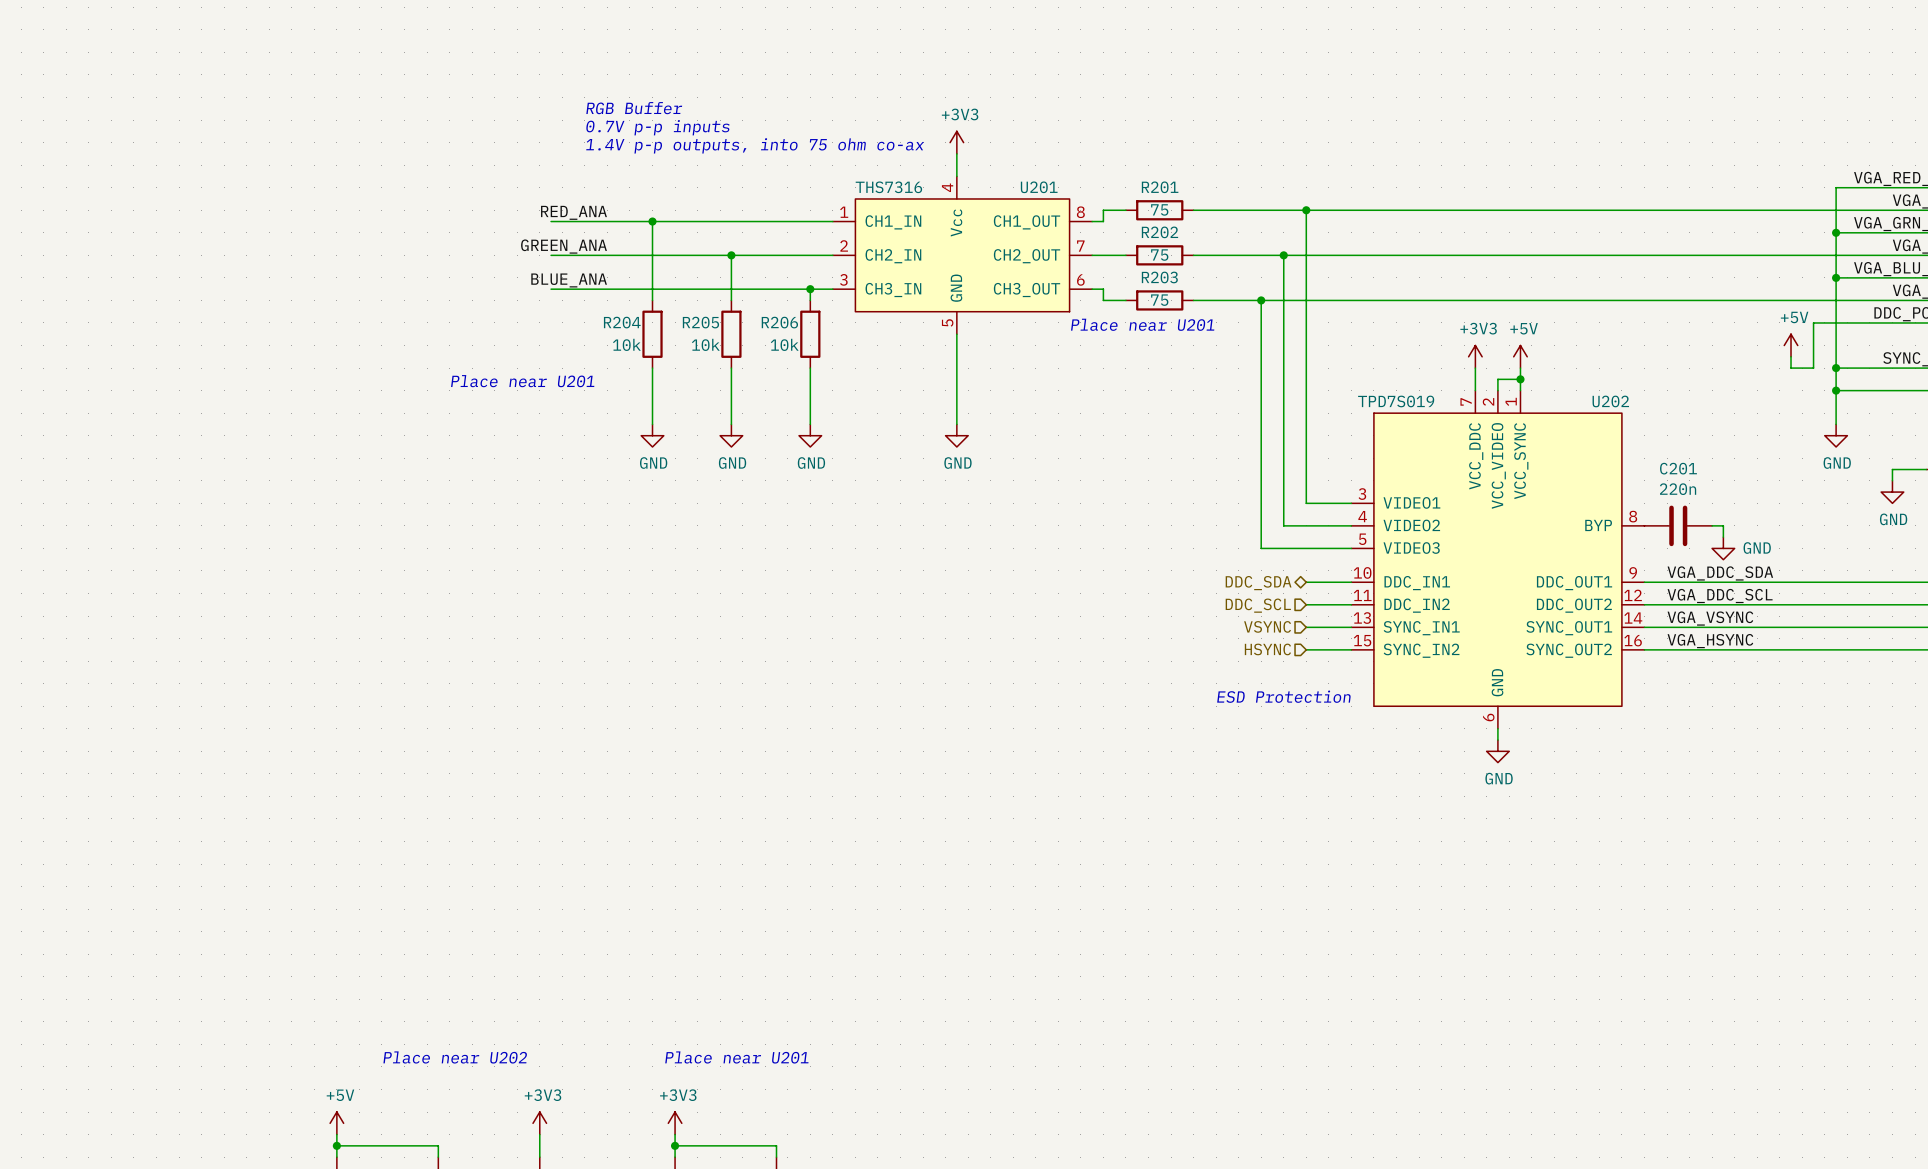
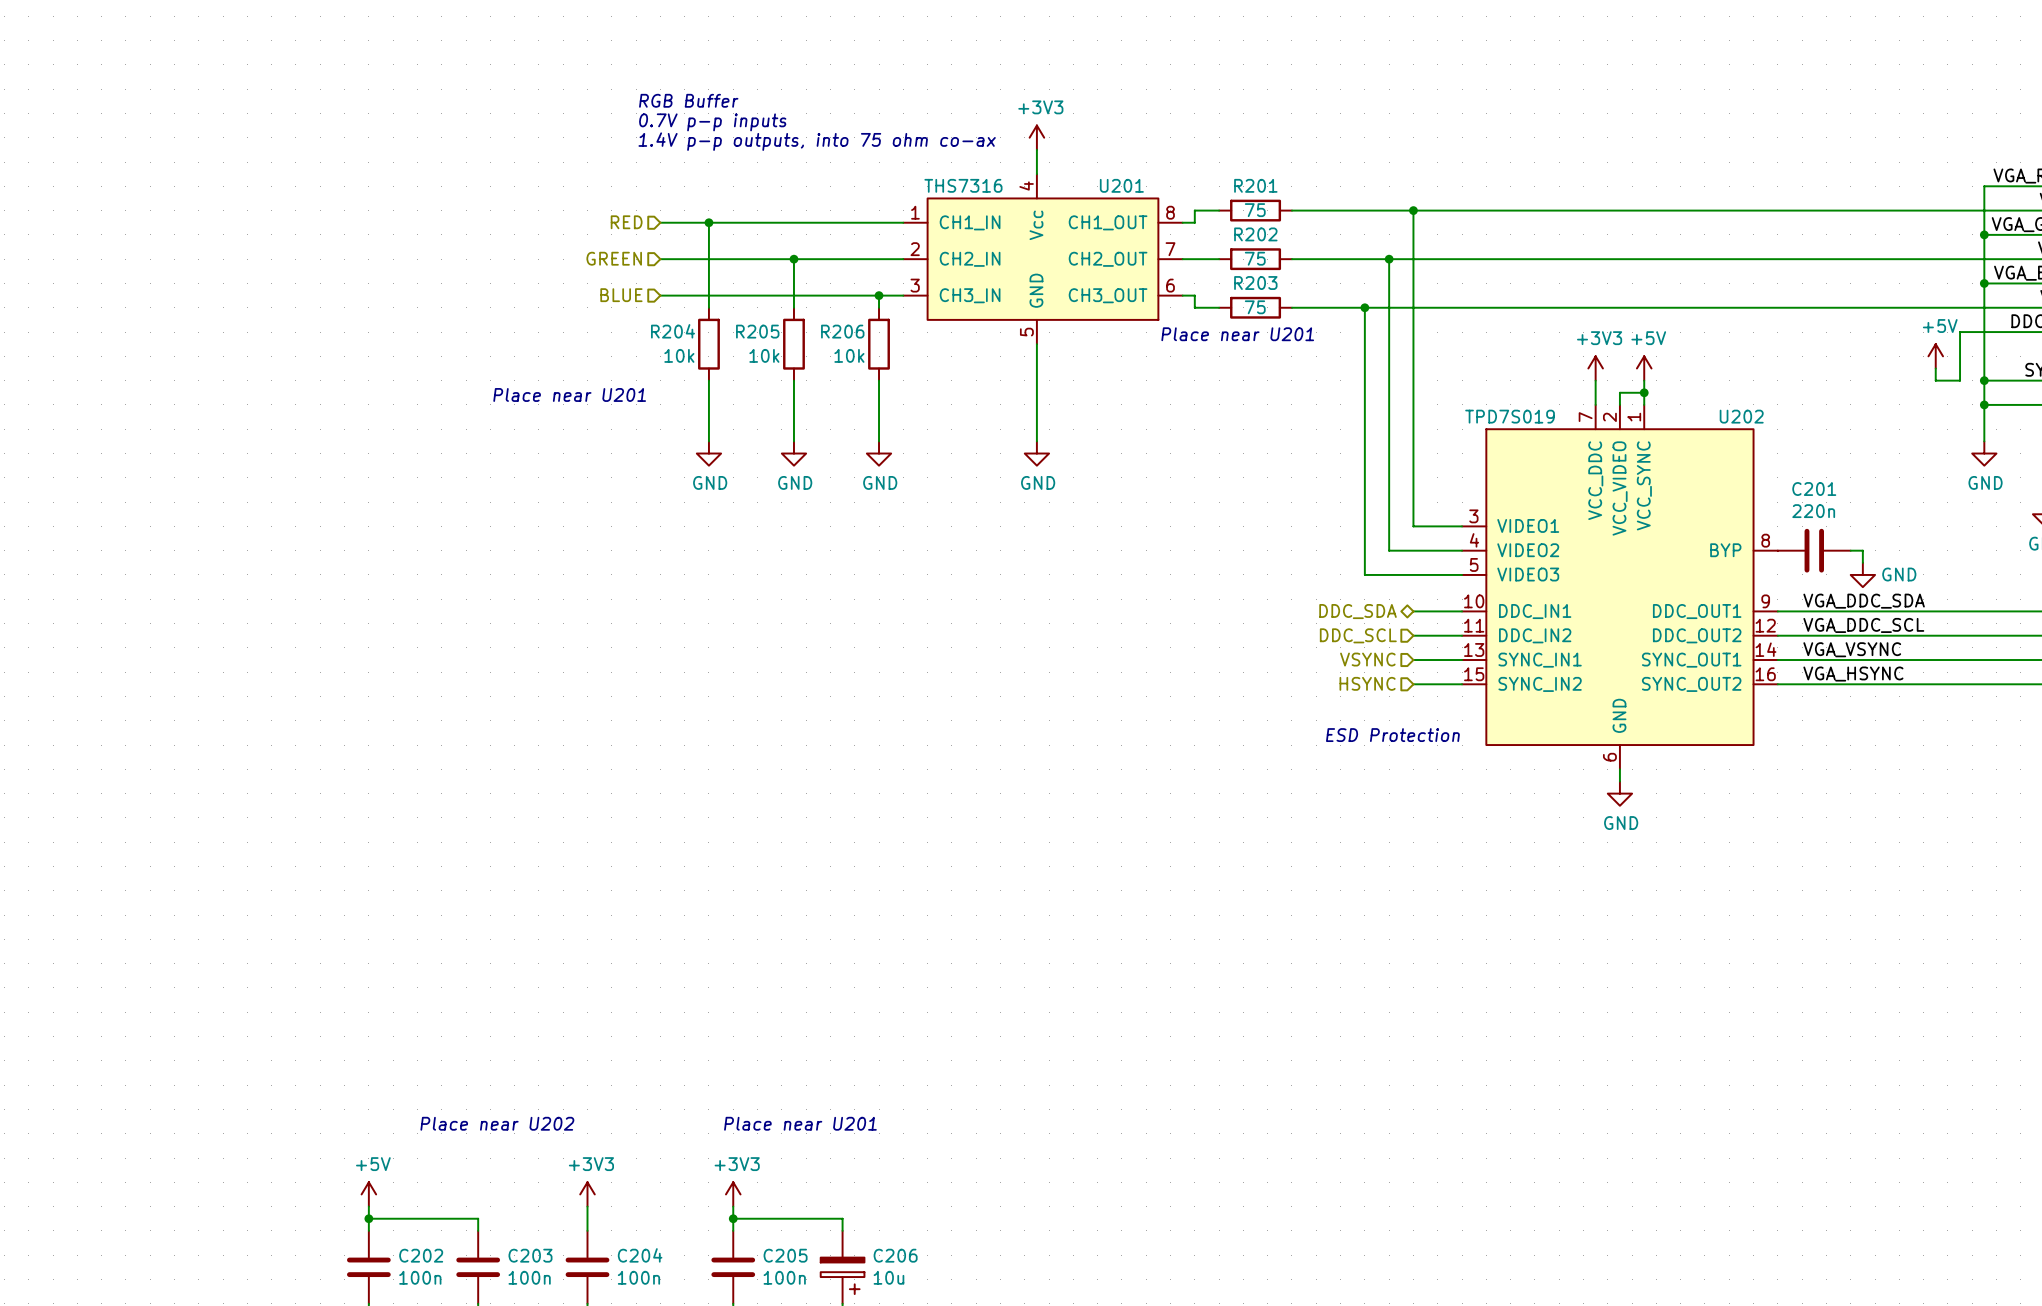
label: RED_ANA (573, 212) -> none
wire: (551, 221) (607, 221) -> none
hierarchical label: none -> RED (626, 222)
label: GREEN_ANA (564, 246) -> none
hierarchical label: none -> GREEN (614, 258)
wire: (551, 255) (607, 255) -> none
label: BLUE_ANA (569, 280) -> none
hierarchical label: none -> BLUE (621, 295)
wire: (551, 289) (607, 289) -> none

